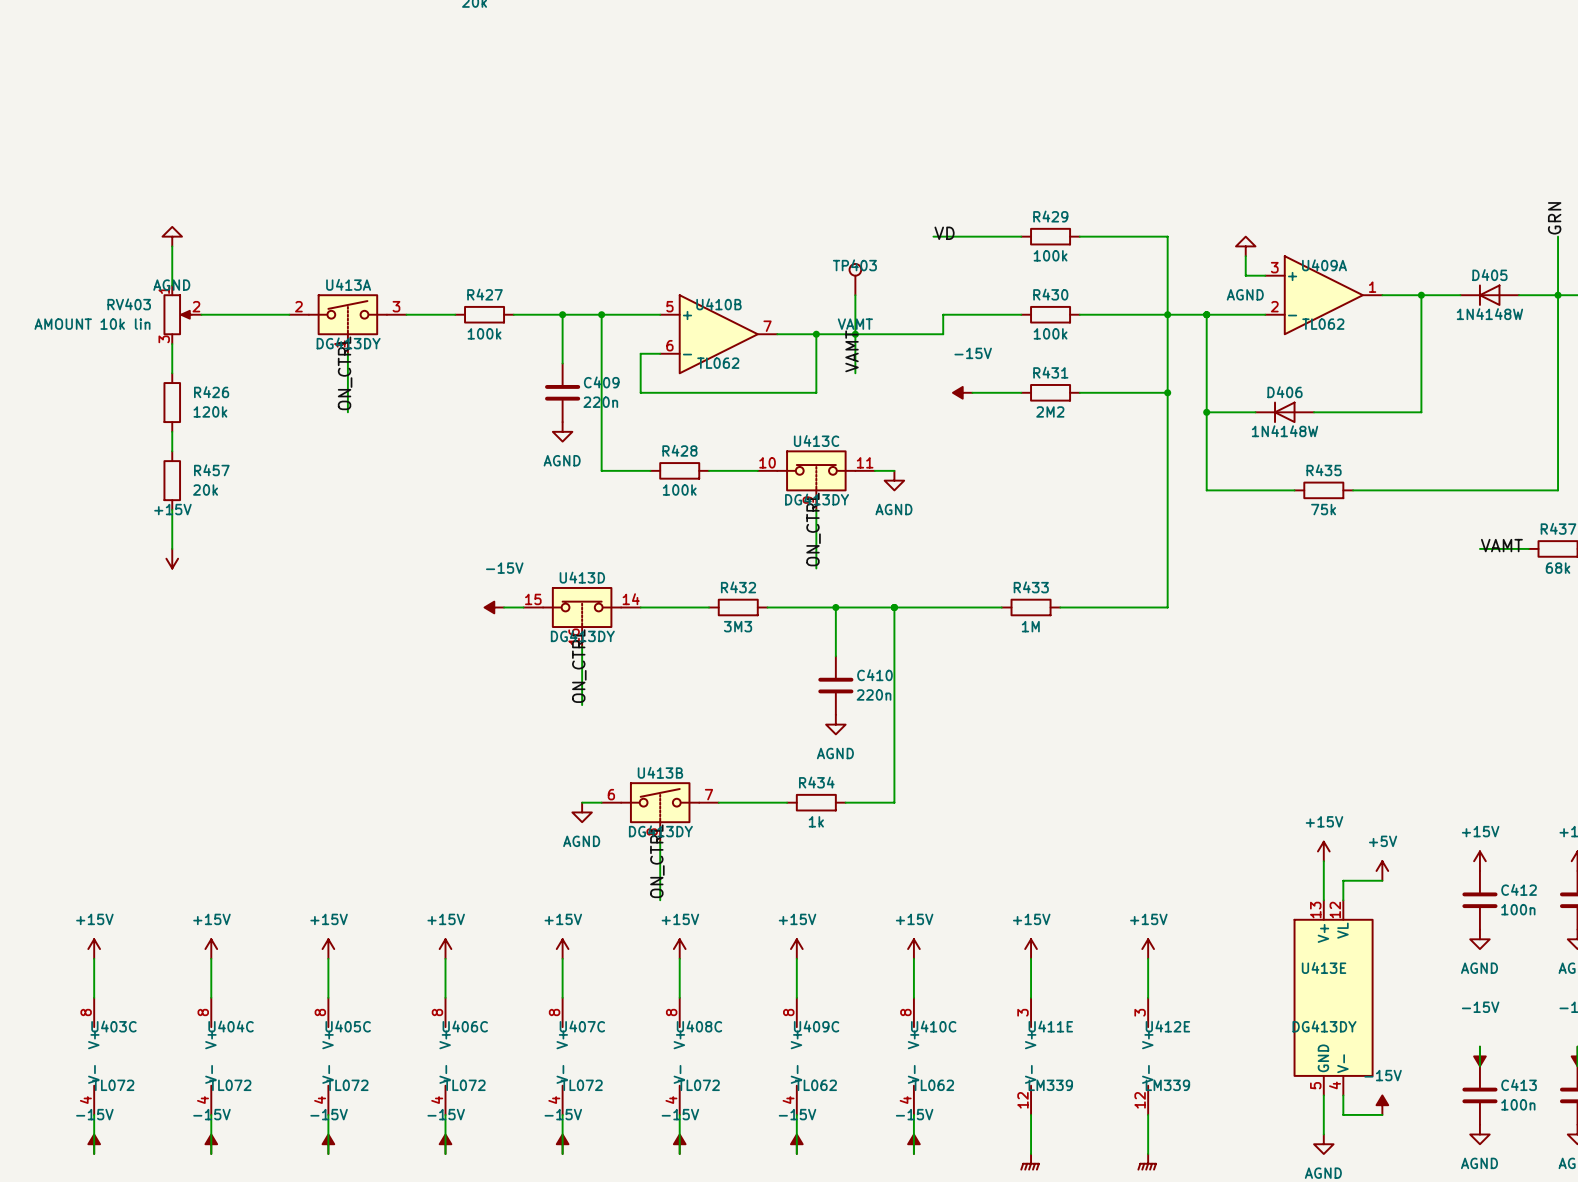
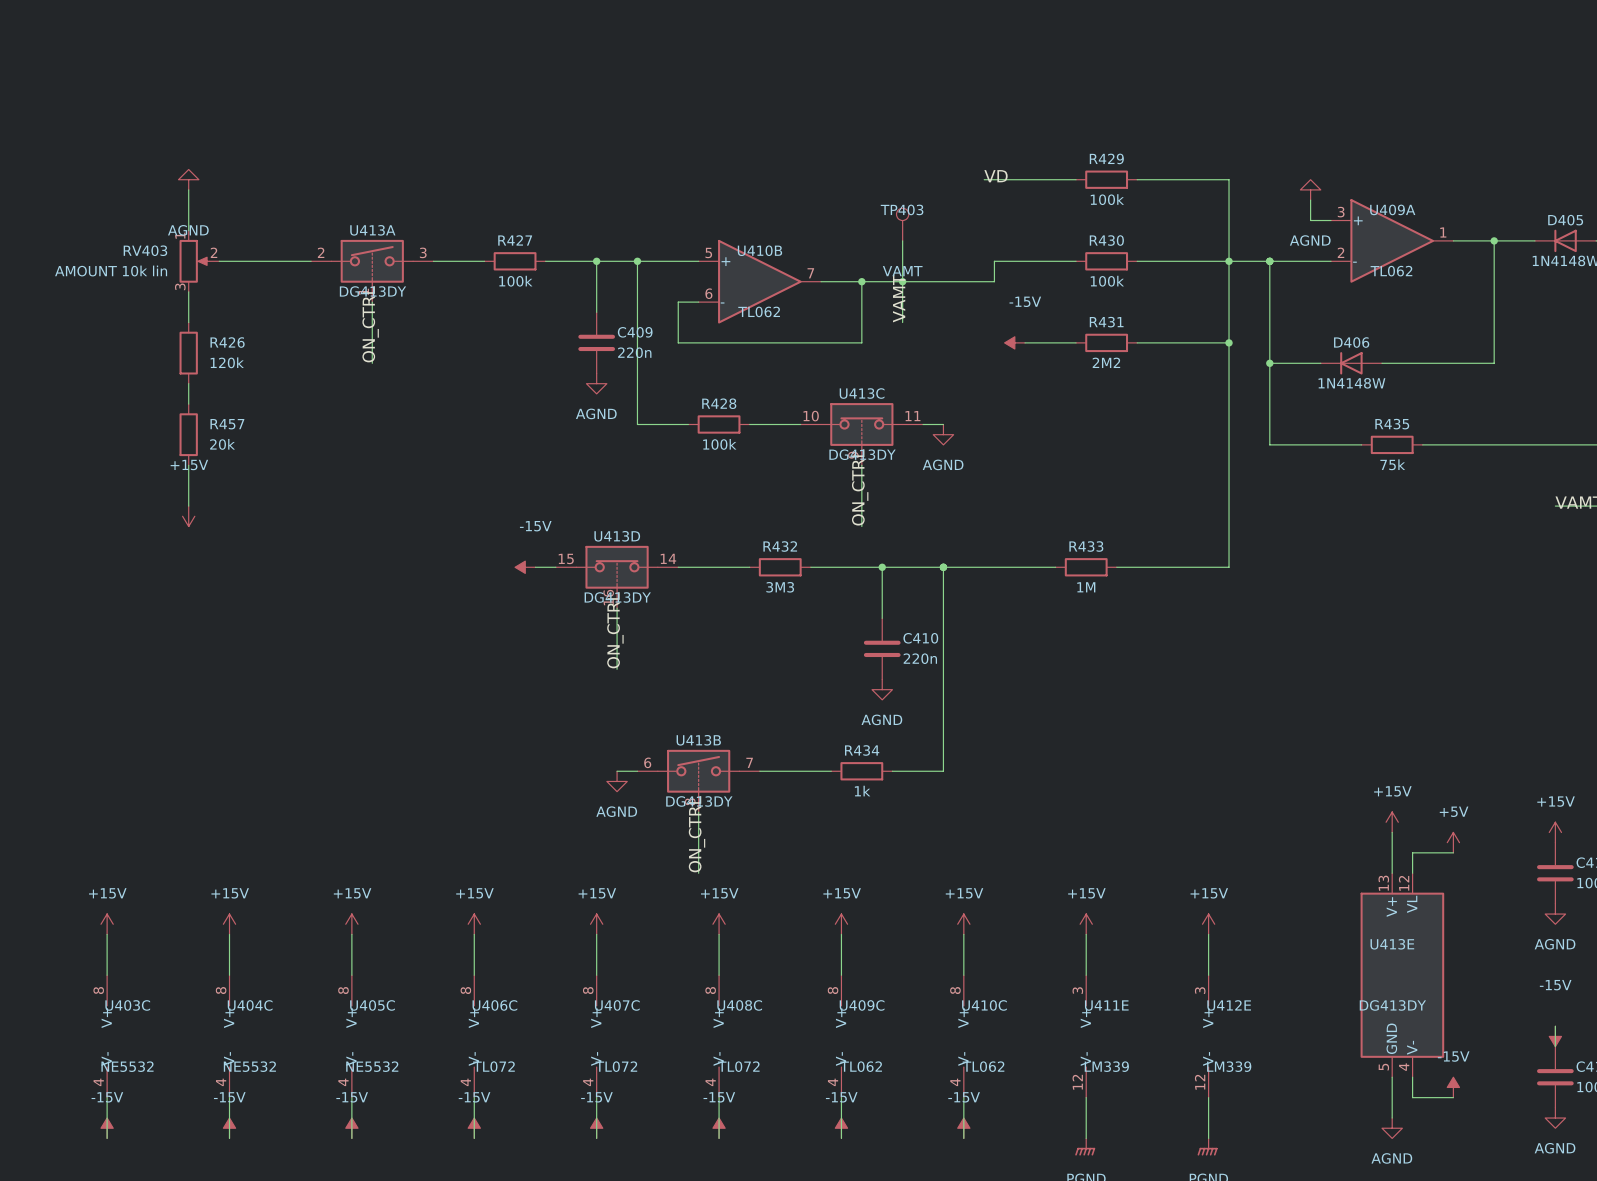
U403C value: TL072 (113, 1085) -> NE5532 (127, 1066)
U404C value: TL072 (230, 1085) -> NE5532 (249, 1066)
U405C value: TL072 (347, 1085) -> NE5532 (372, 1066)

